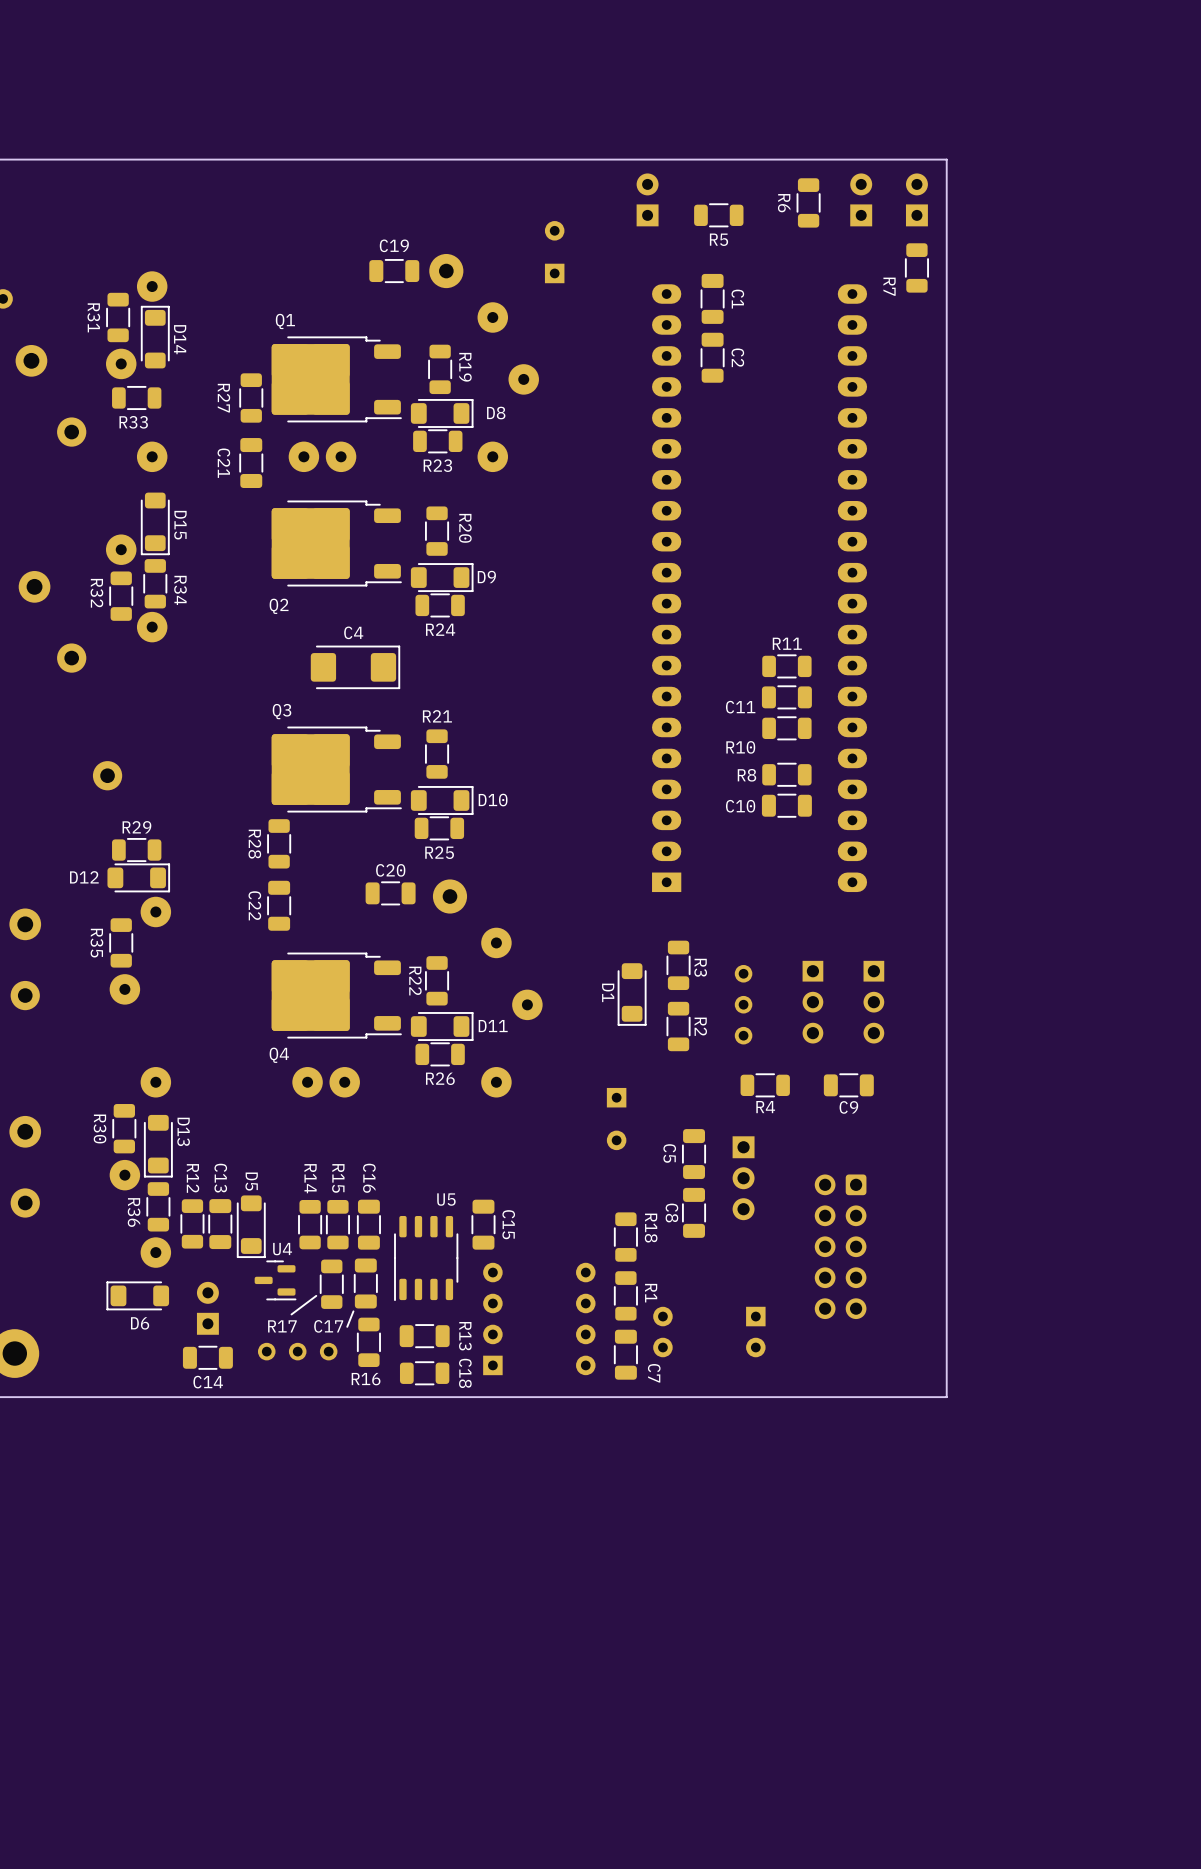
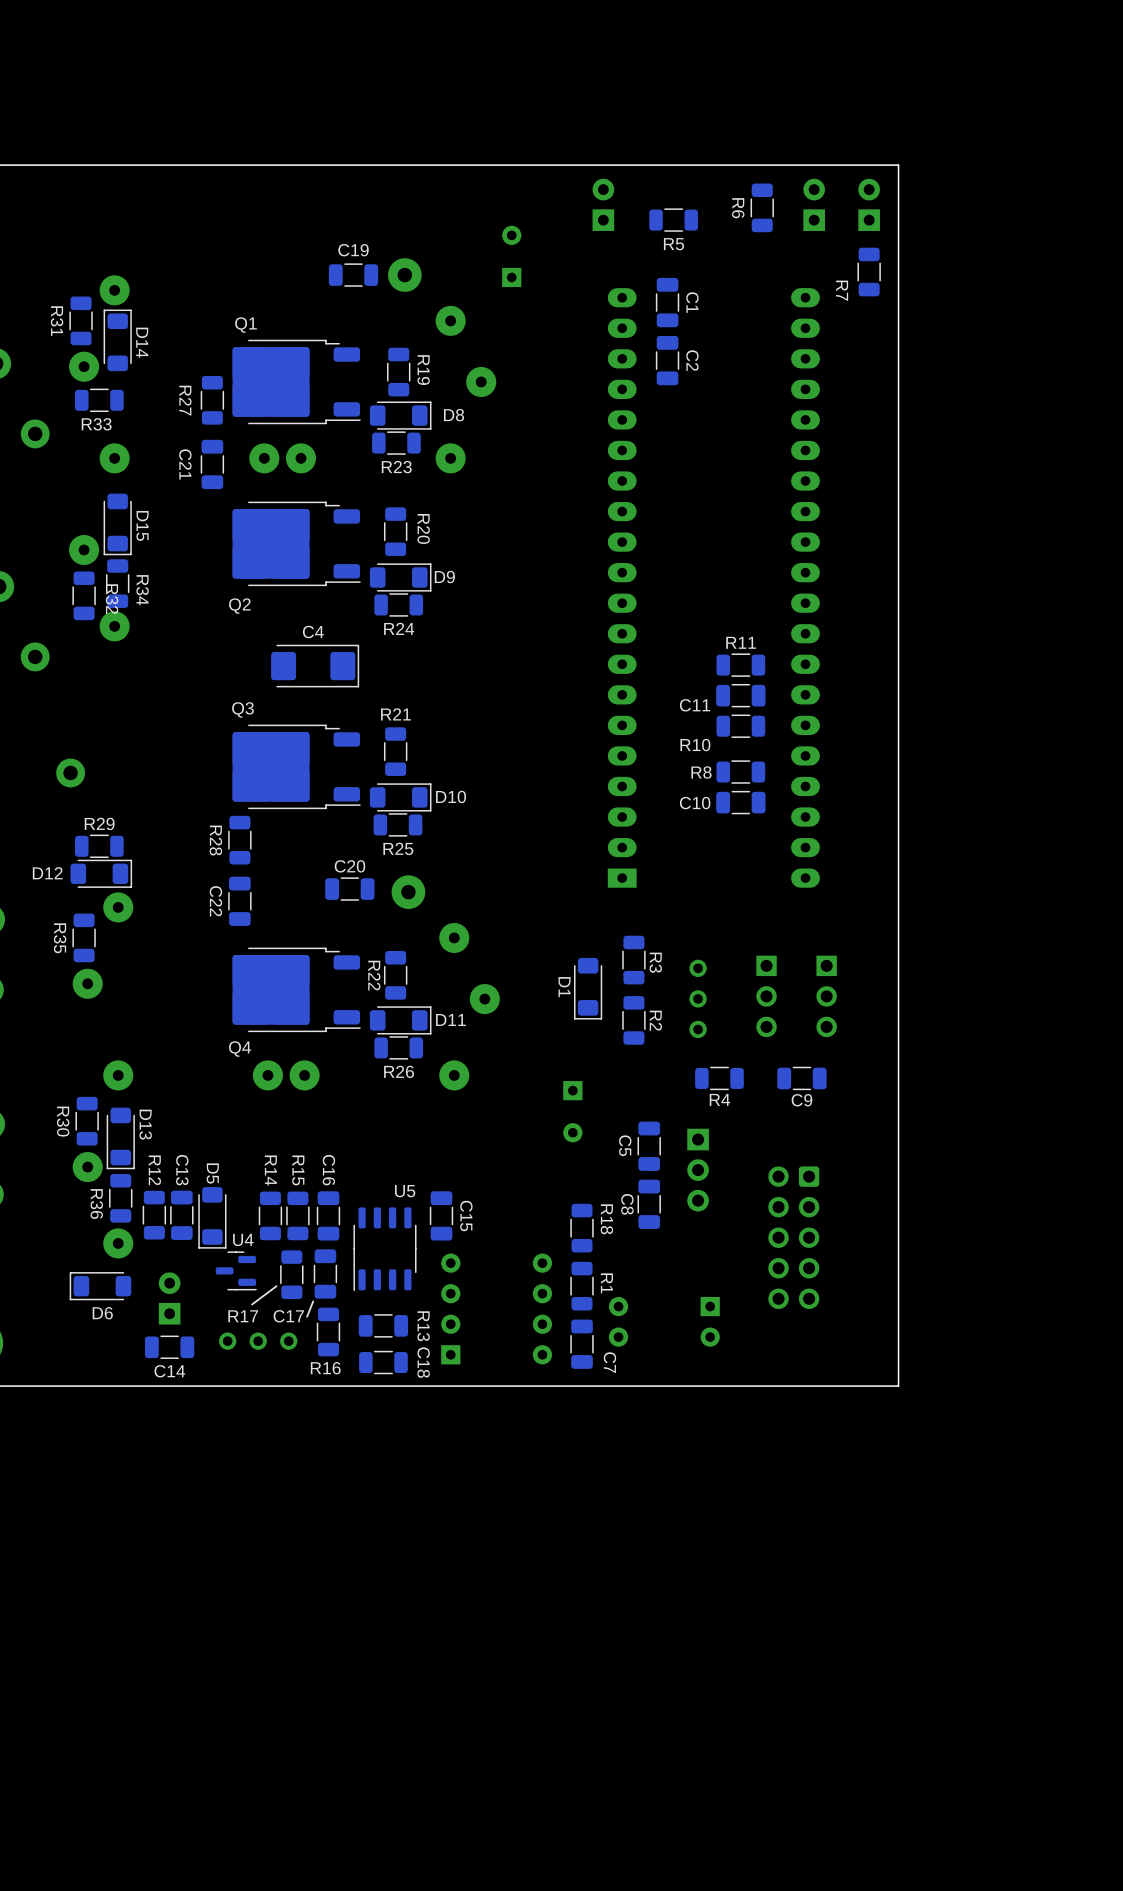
R32 name position: R32 (96, 593) -> R32 (112, 599)

